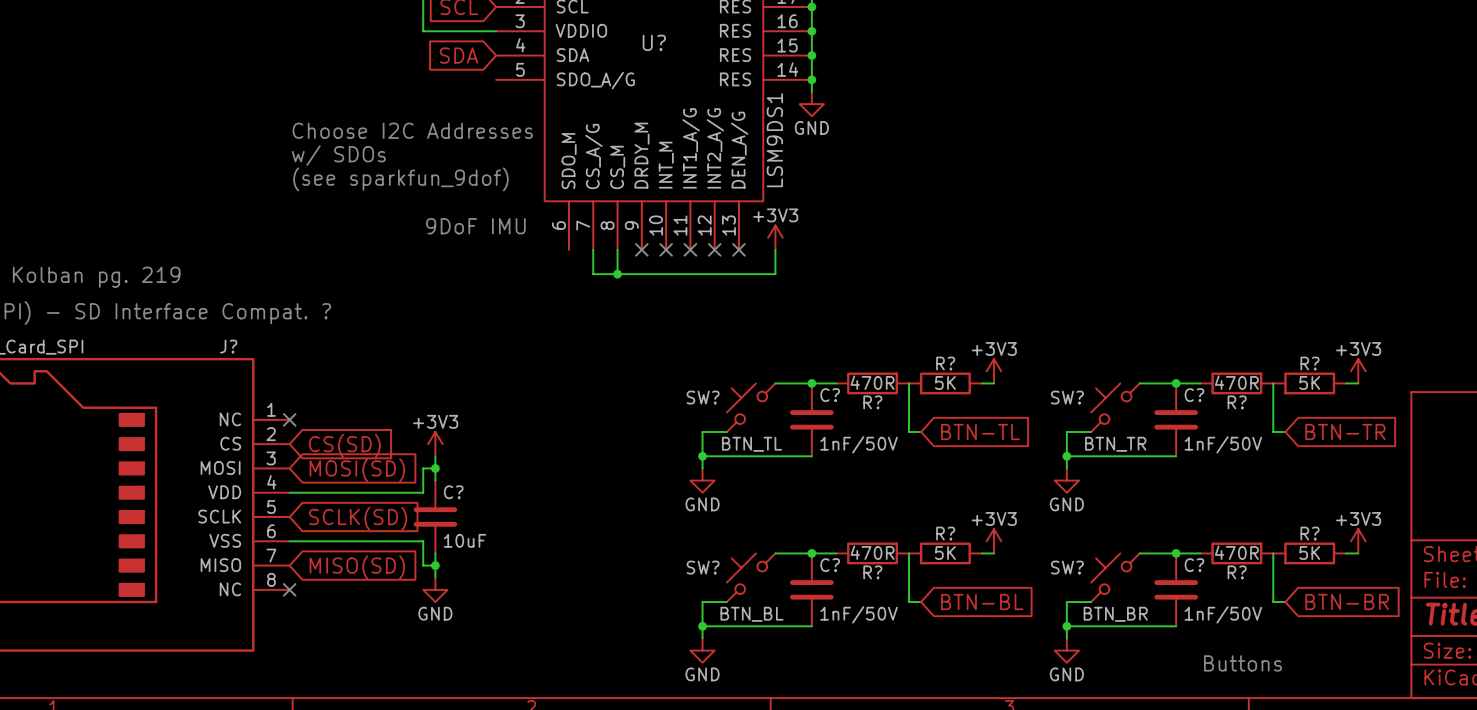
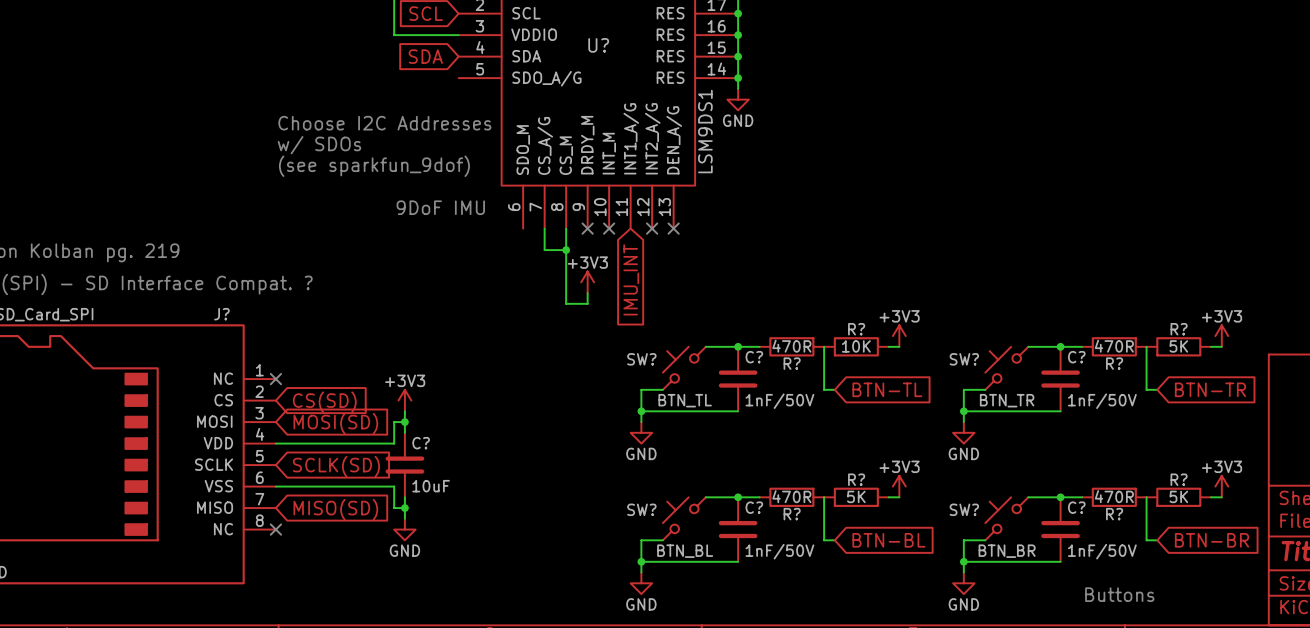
power symbol position: +3V3 (775, 237) -> +3V3 (587, 282)
no-connect mark: (690, 249) -> none
wire: (775, 249) (775, 274) (617, 274) -> (587, 293) (587, 303) (566, 303) (566, 250)
global label: none -> IMU_INT (631, 279)
R? value: 5K (945, 382) -> 10K (856, 346)

